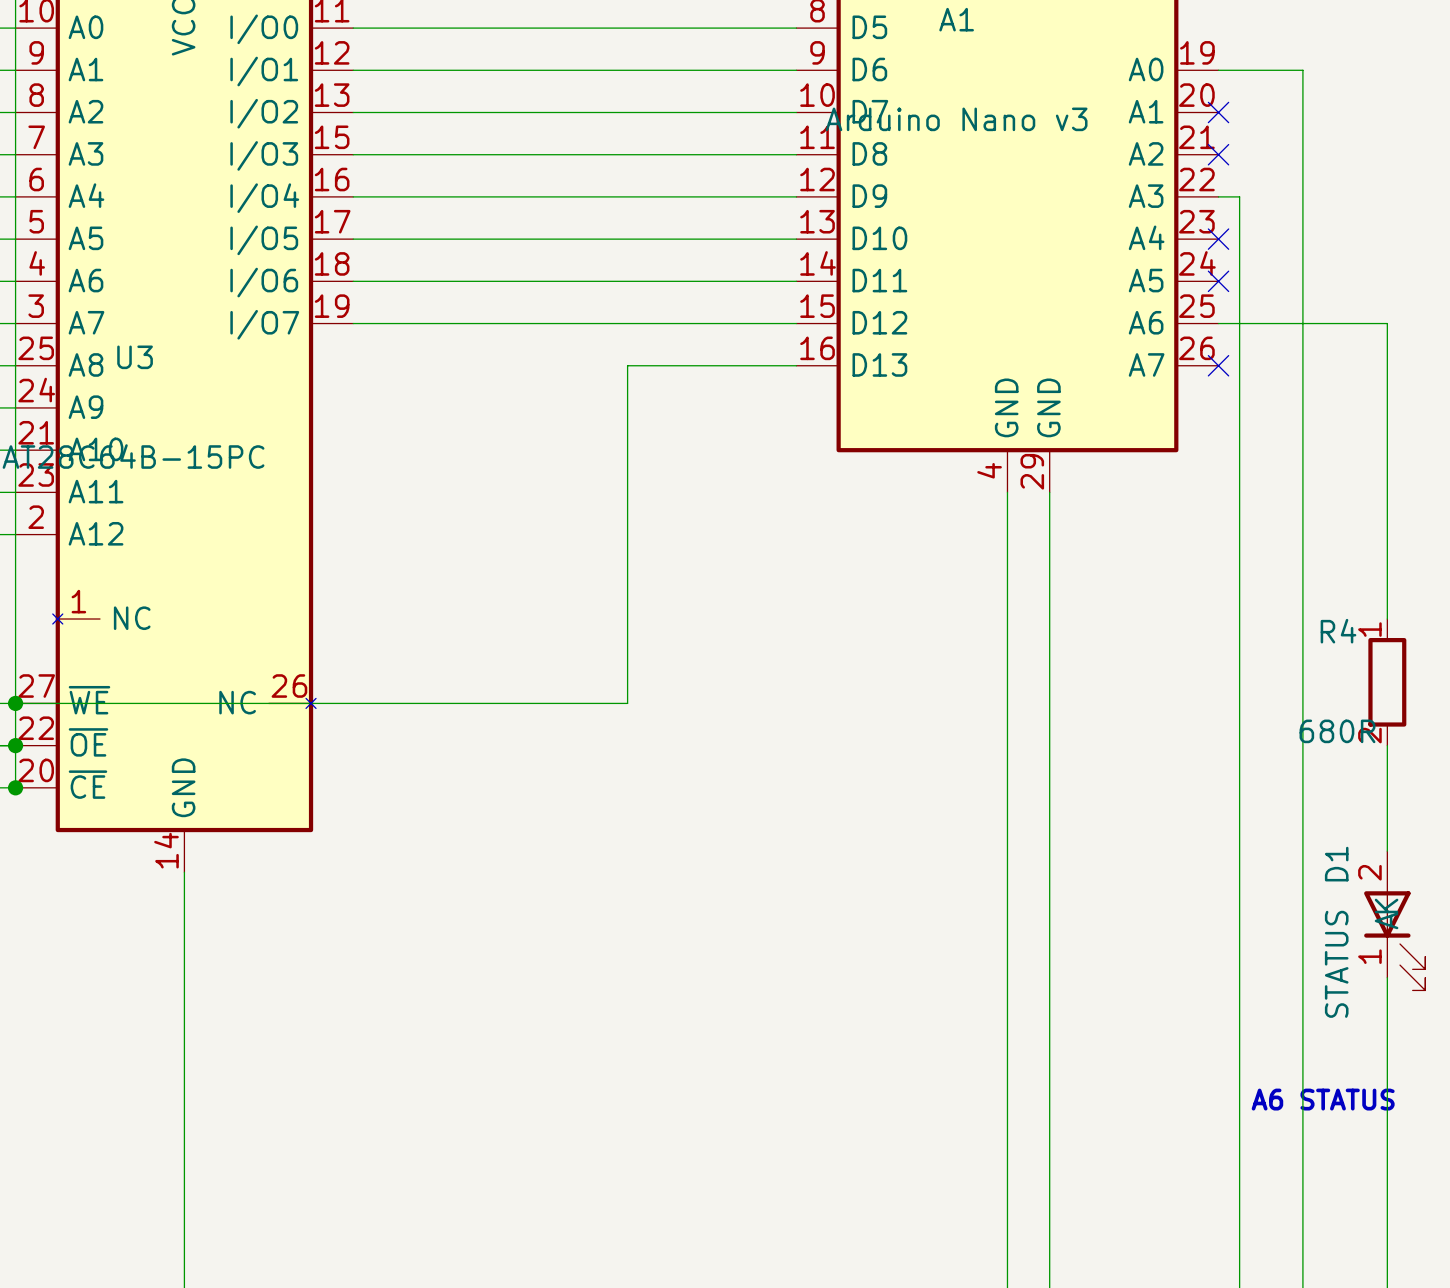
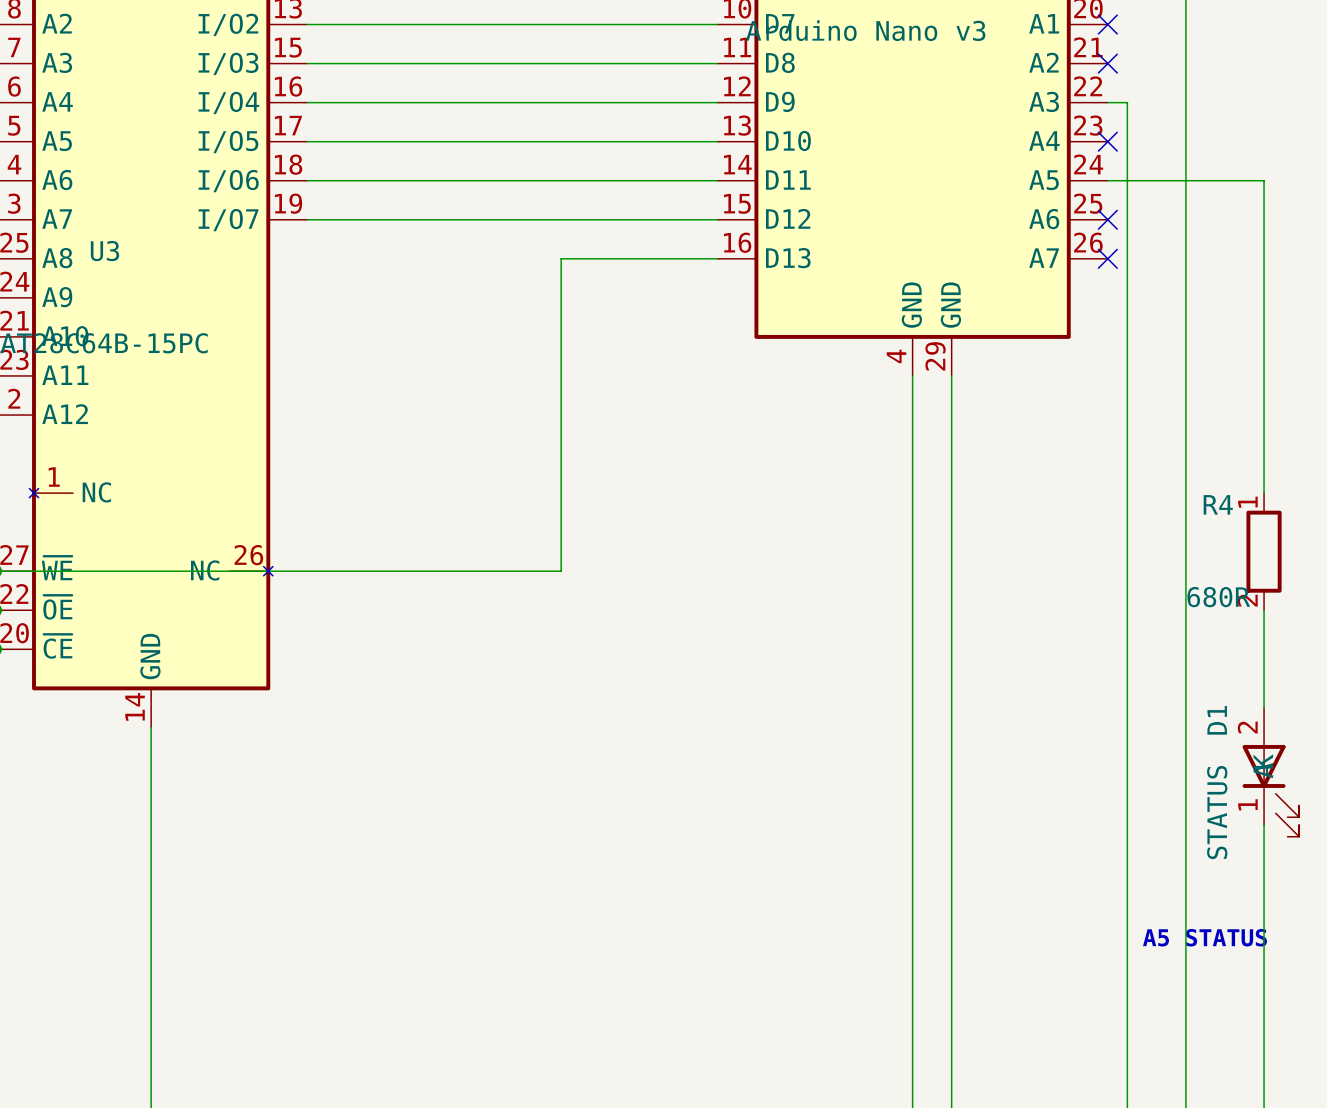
no-connect mark position: (1218, 281) -> (1107, 219)
wire: (1218, 323) (1387, 323) -> (1107, 180) (1264, 180) (1264, 219)
text: A6 STATUS (1323, 1099) -> A5 STATUS (1204, 937)

